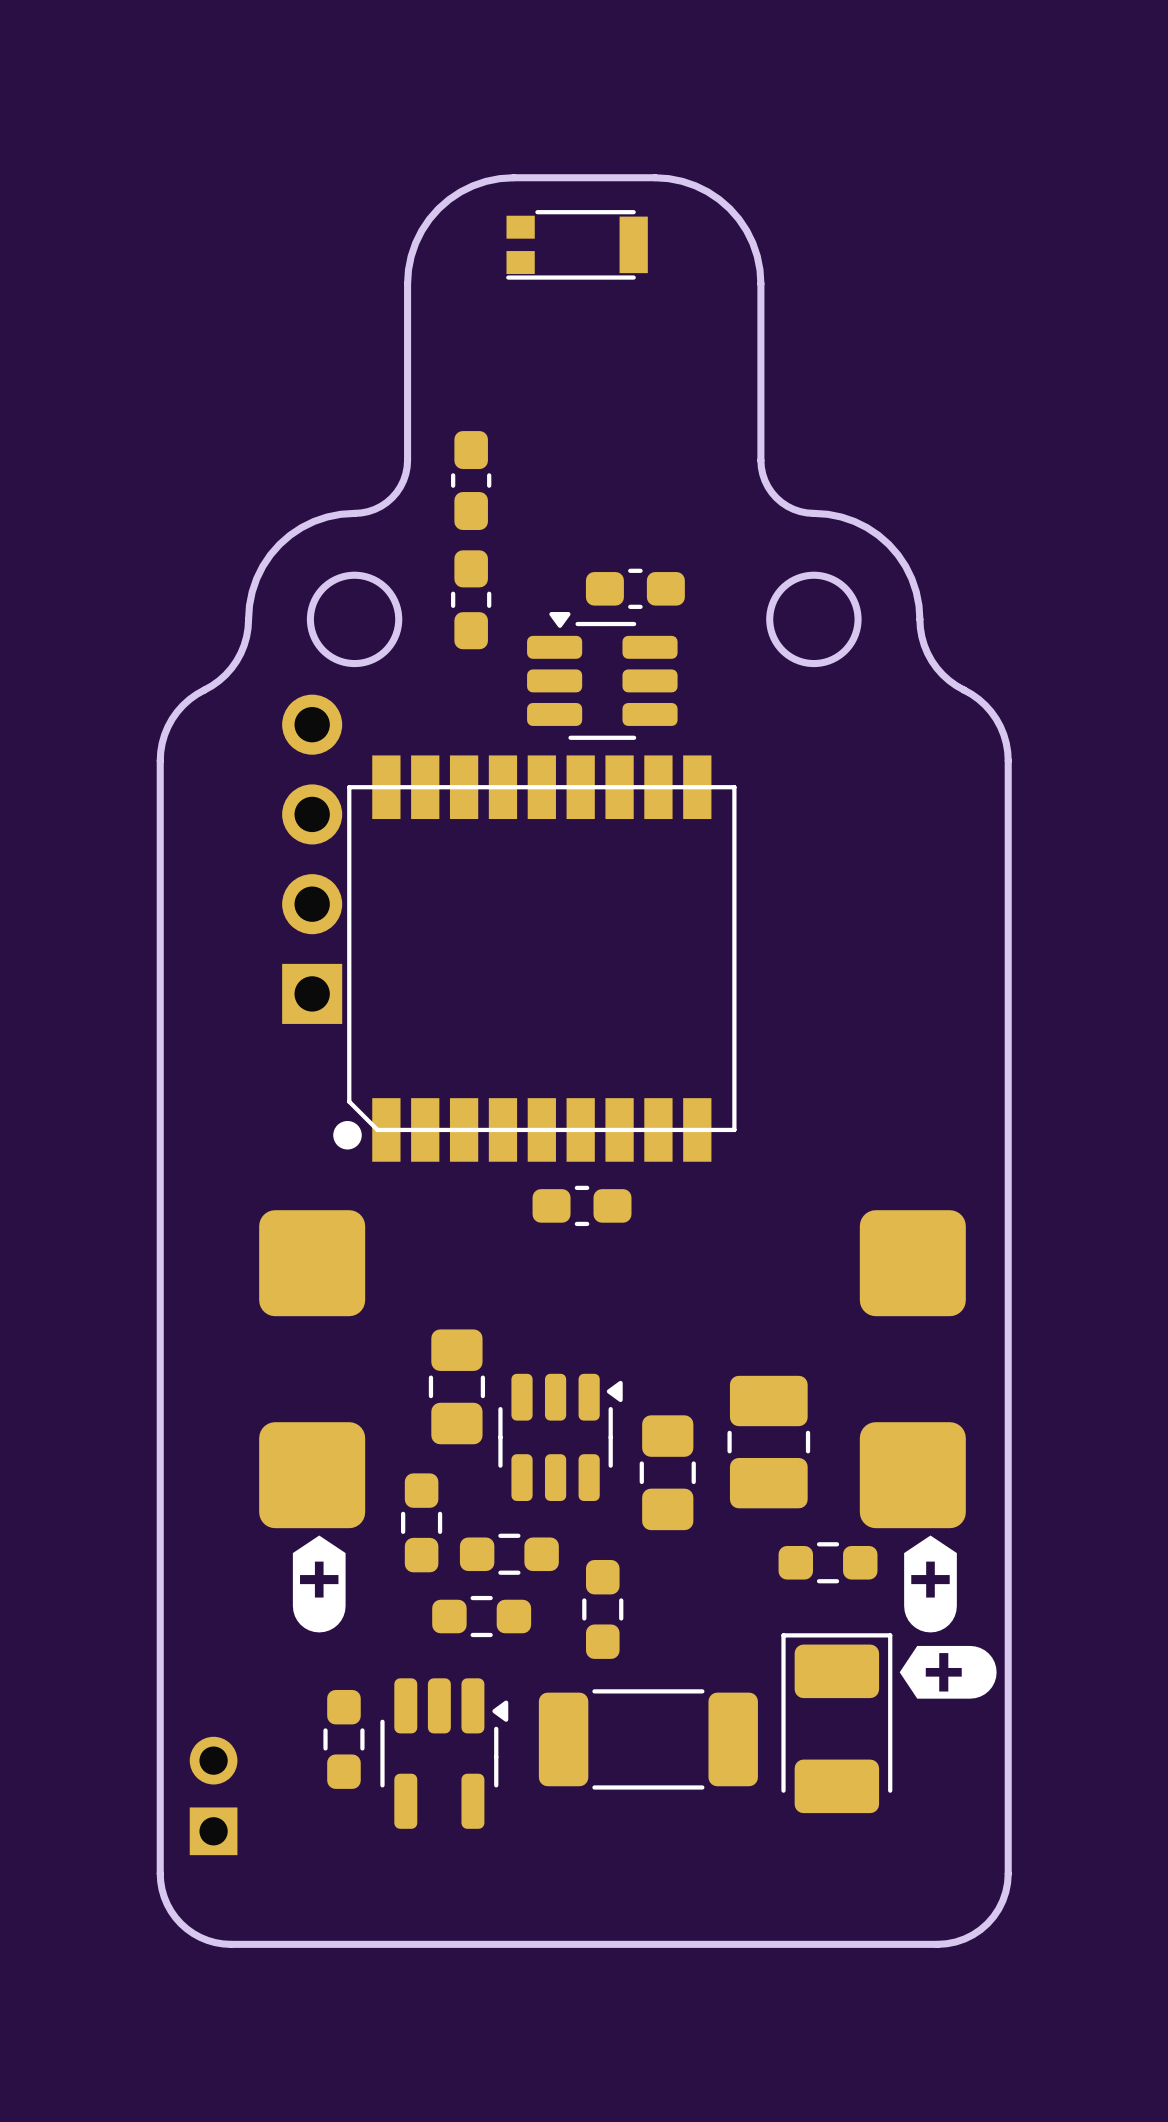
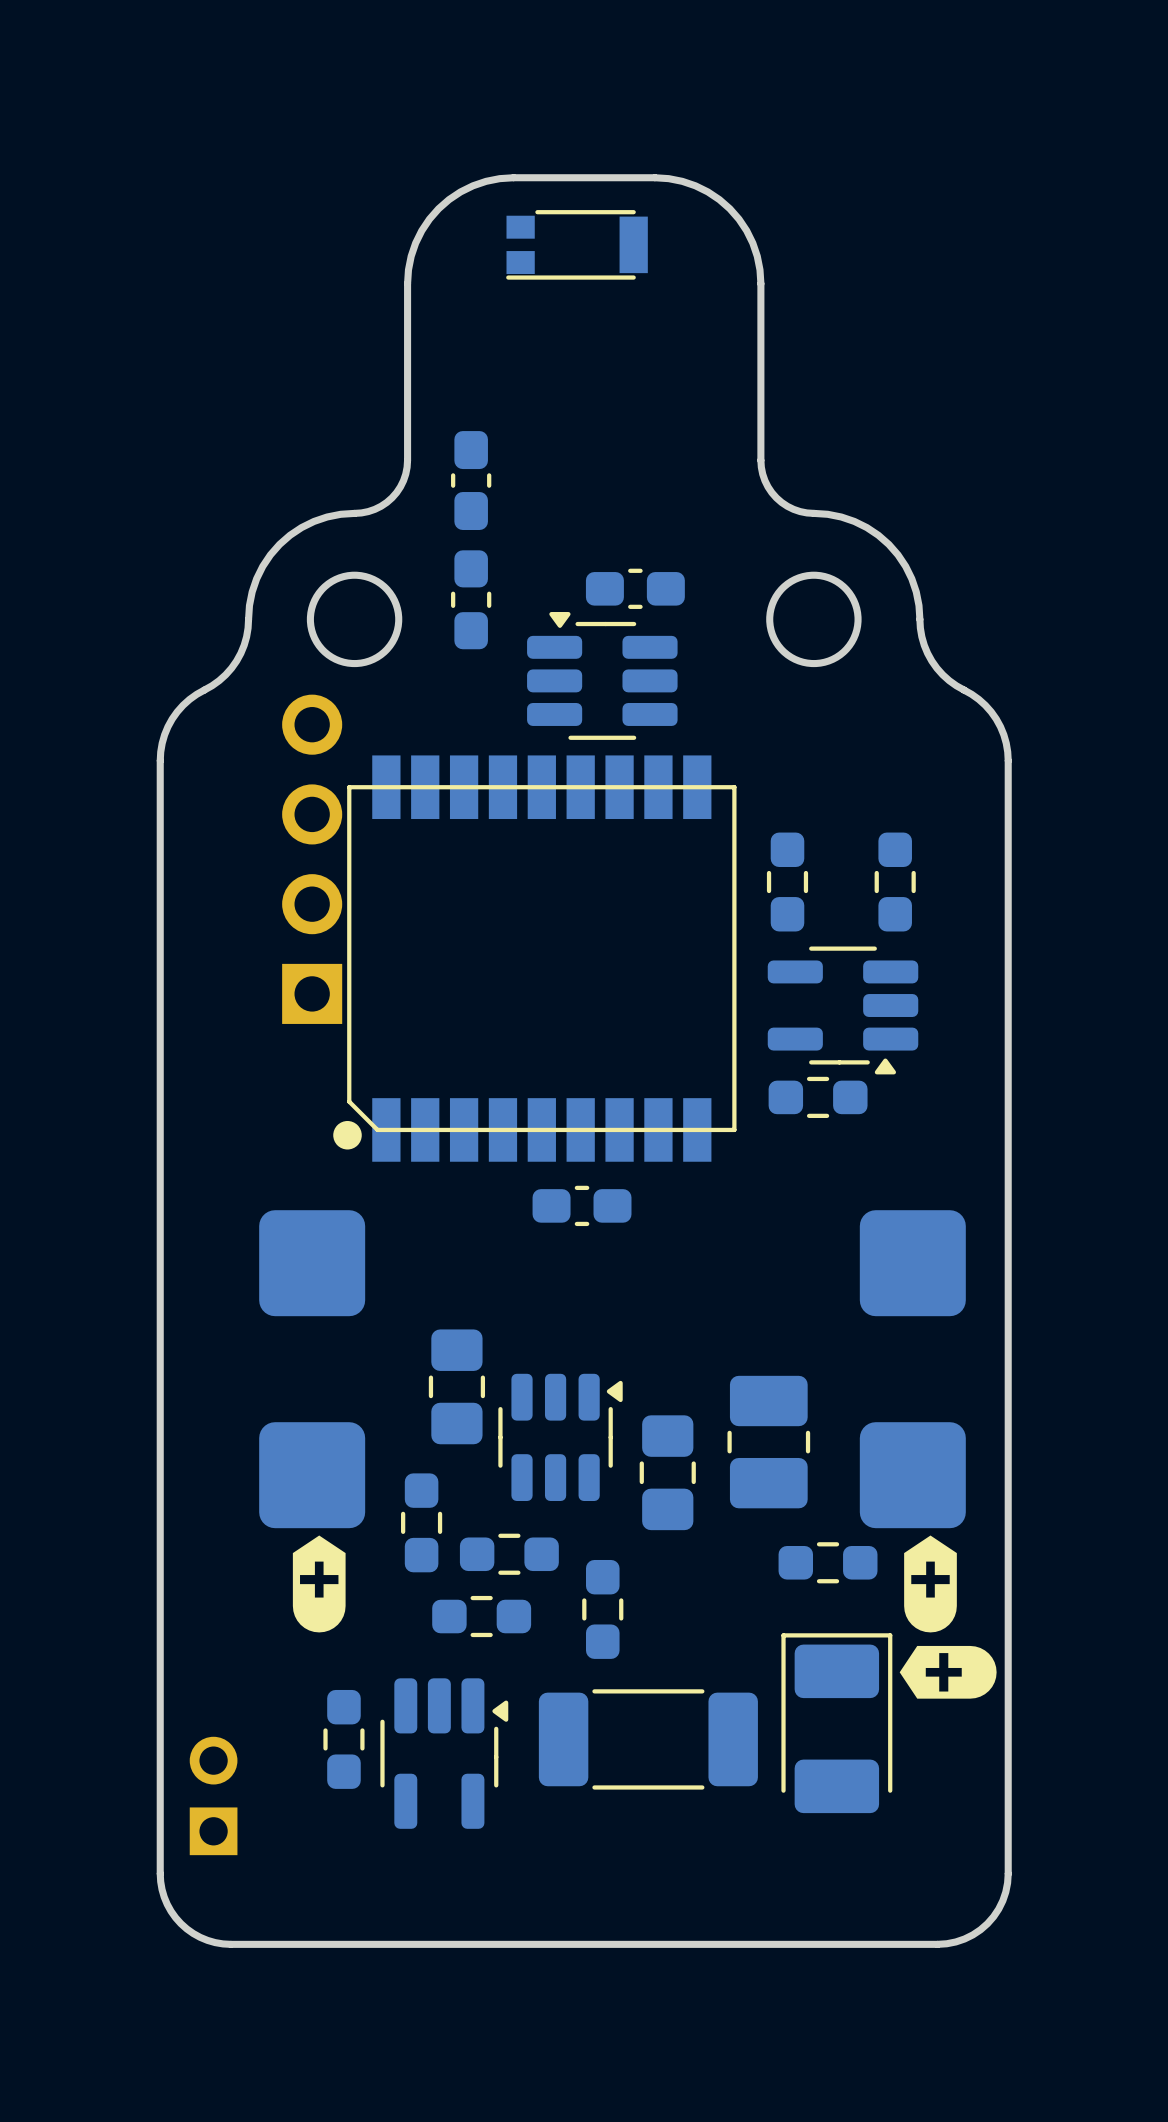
part: none -> (787, 882)
part: none -> (895, 882)
part: none -> (843, 1010)
part: none -> (818, 1097)

